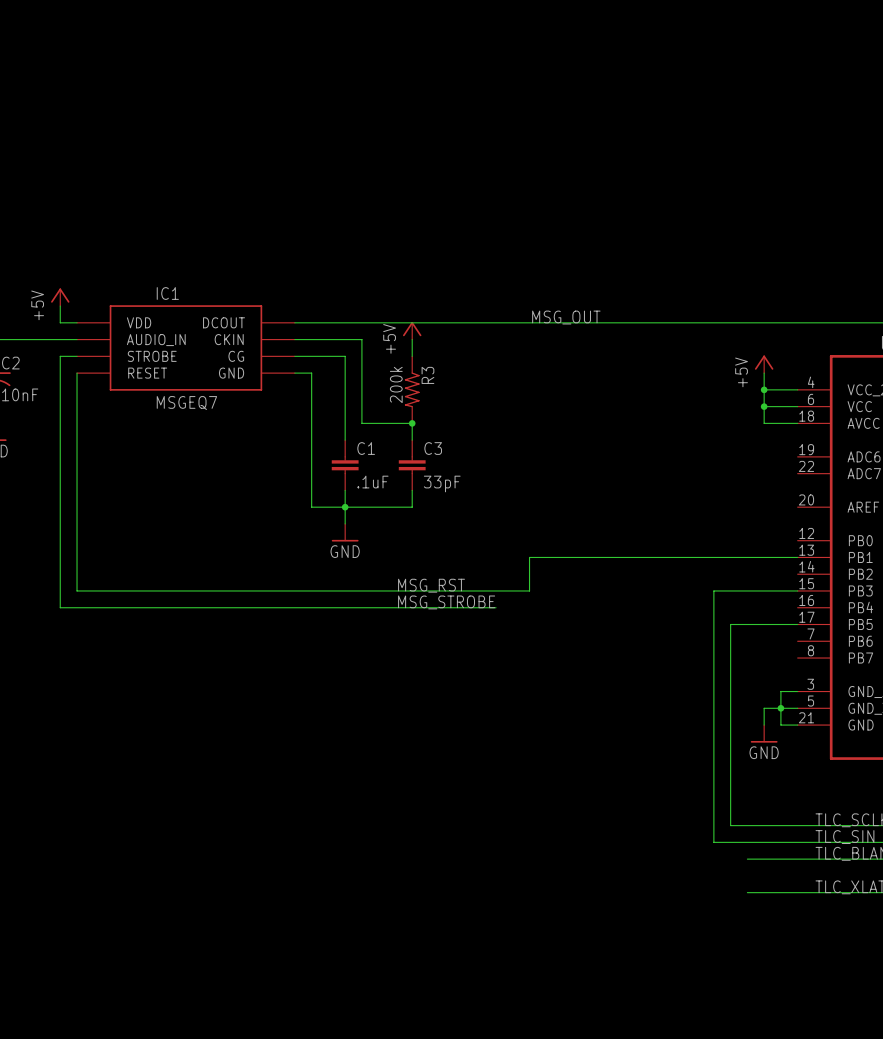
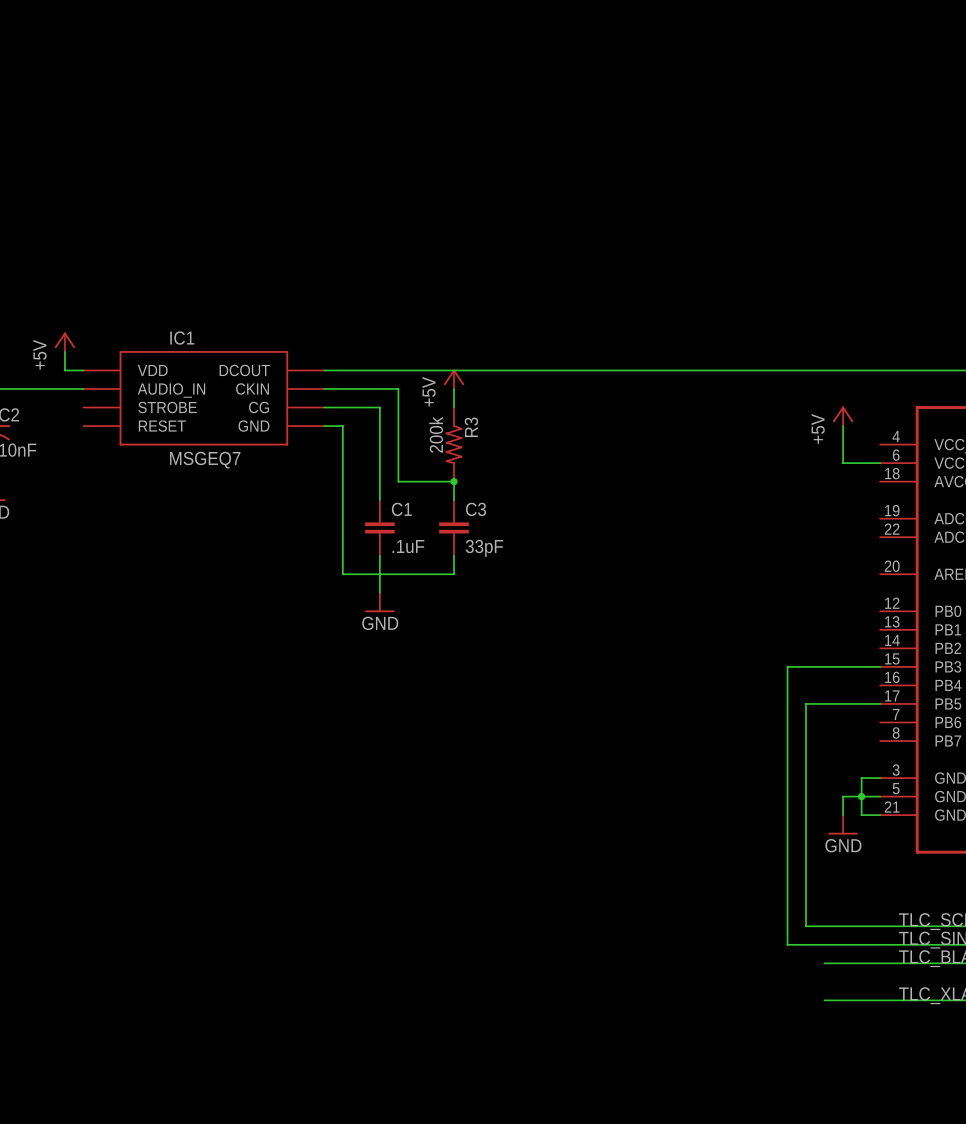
label: MSG_OUT (566, 317) -> none
wire: (77, 356) (60, 356) (60, 607) (496, 607) -> none
wire: (77, 373) (77, 590) (529, 590) (529, 557) (797, 557) -> none
wire: (764, 389) (797, 389) -> none
junction: (764, 389) -> none
wire: (764, 406) (764, 423) (797, 423) -> none
junction: (764, 406) -> none
junction: (345, 507) -> none
label: MSG_RST (431, 585) -> none
label: MSG_STROBE (446, 602) -> none

